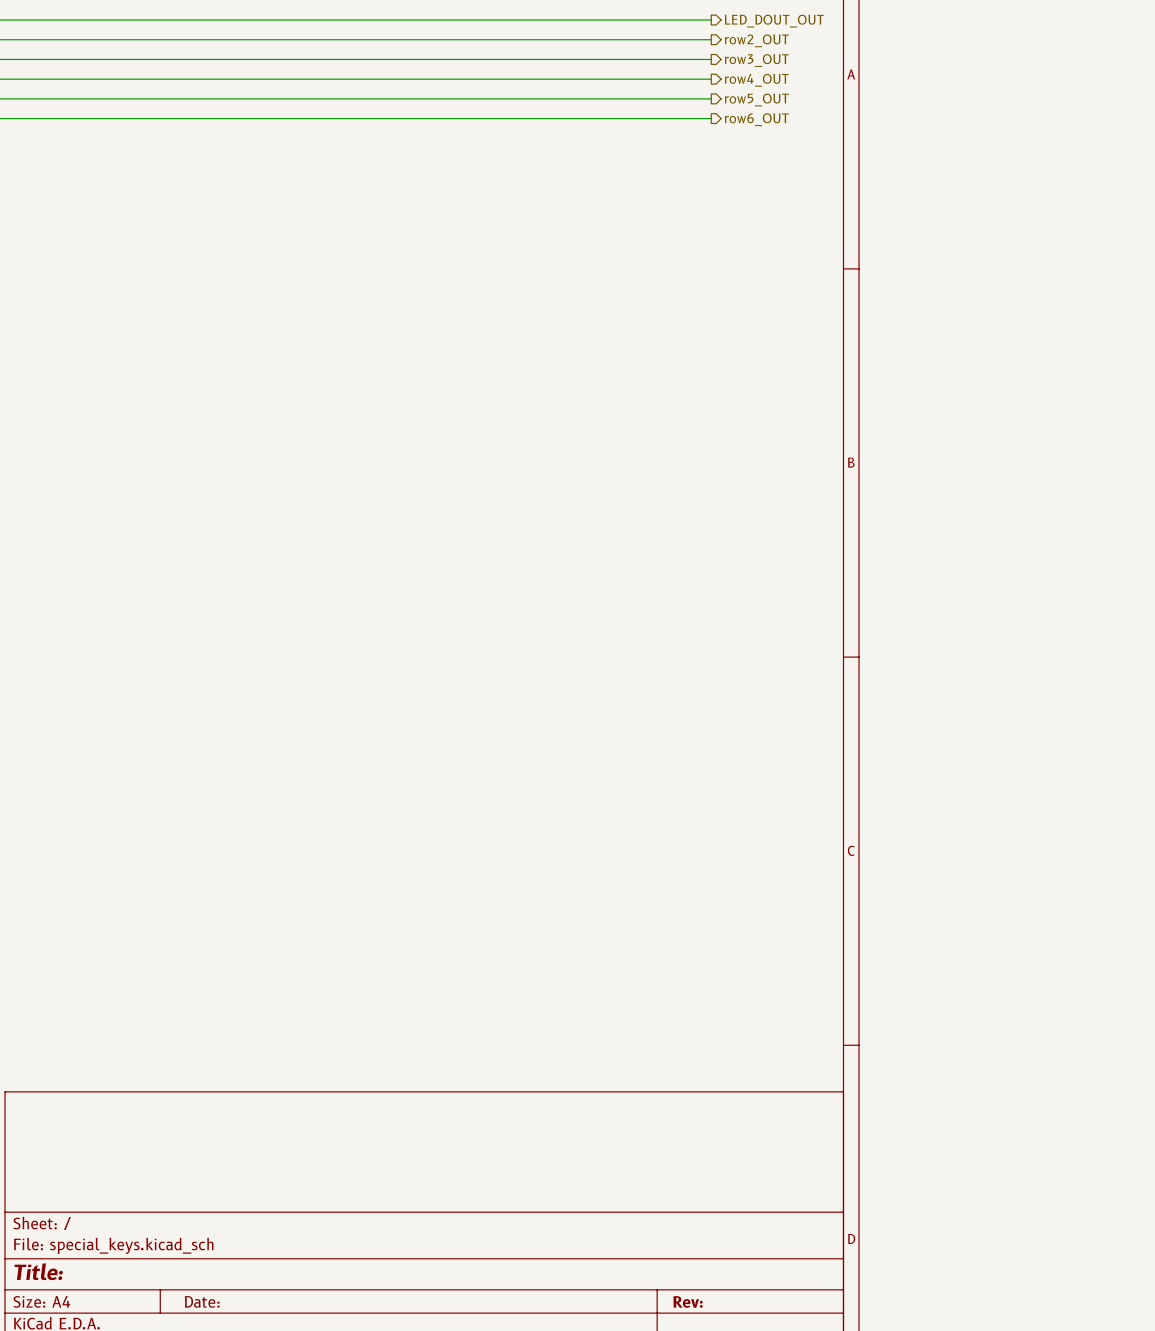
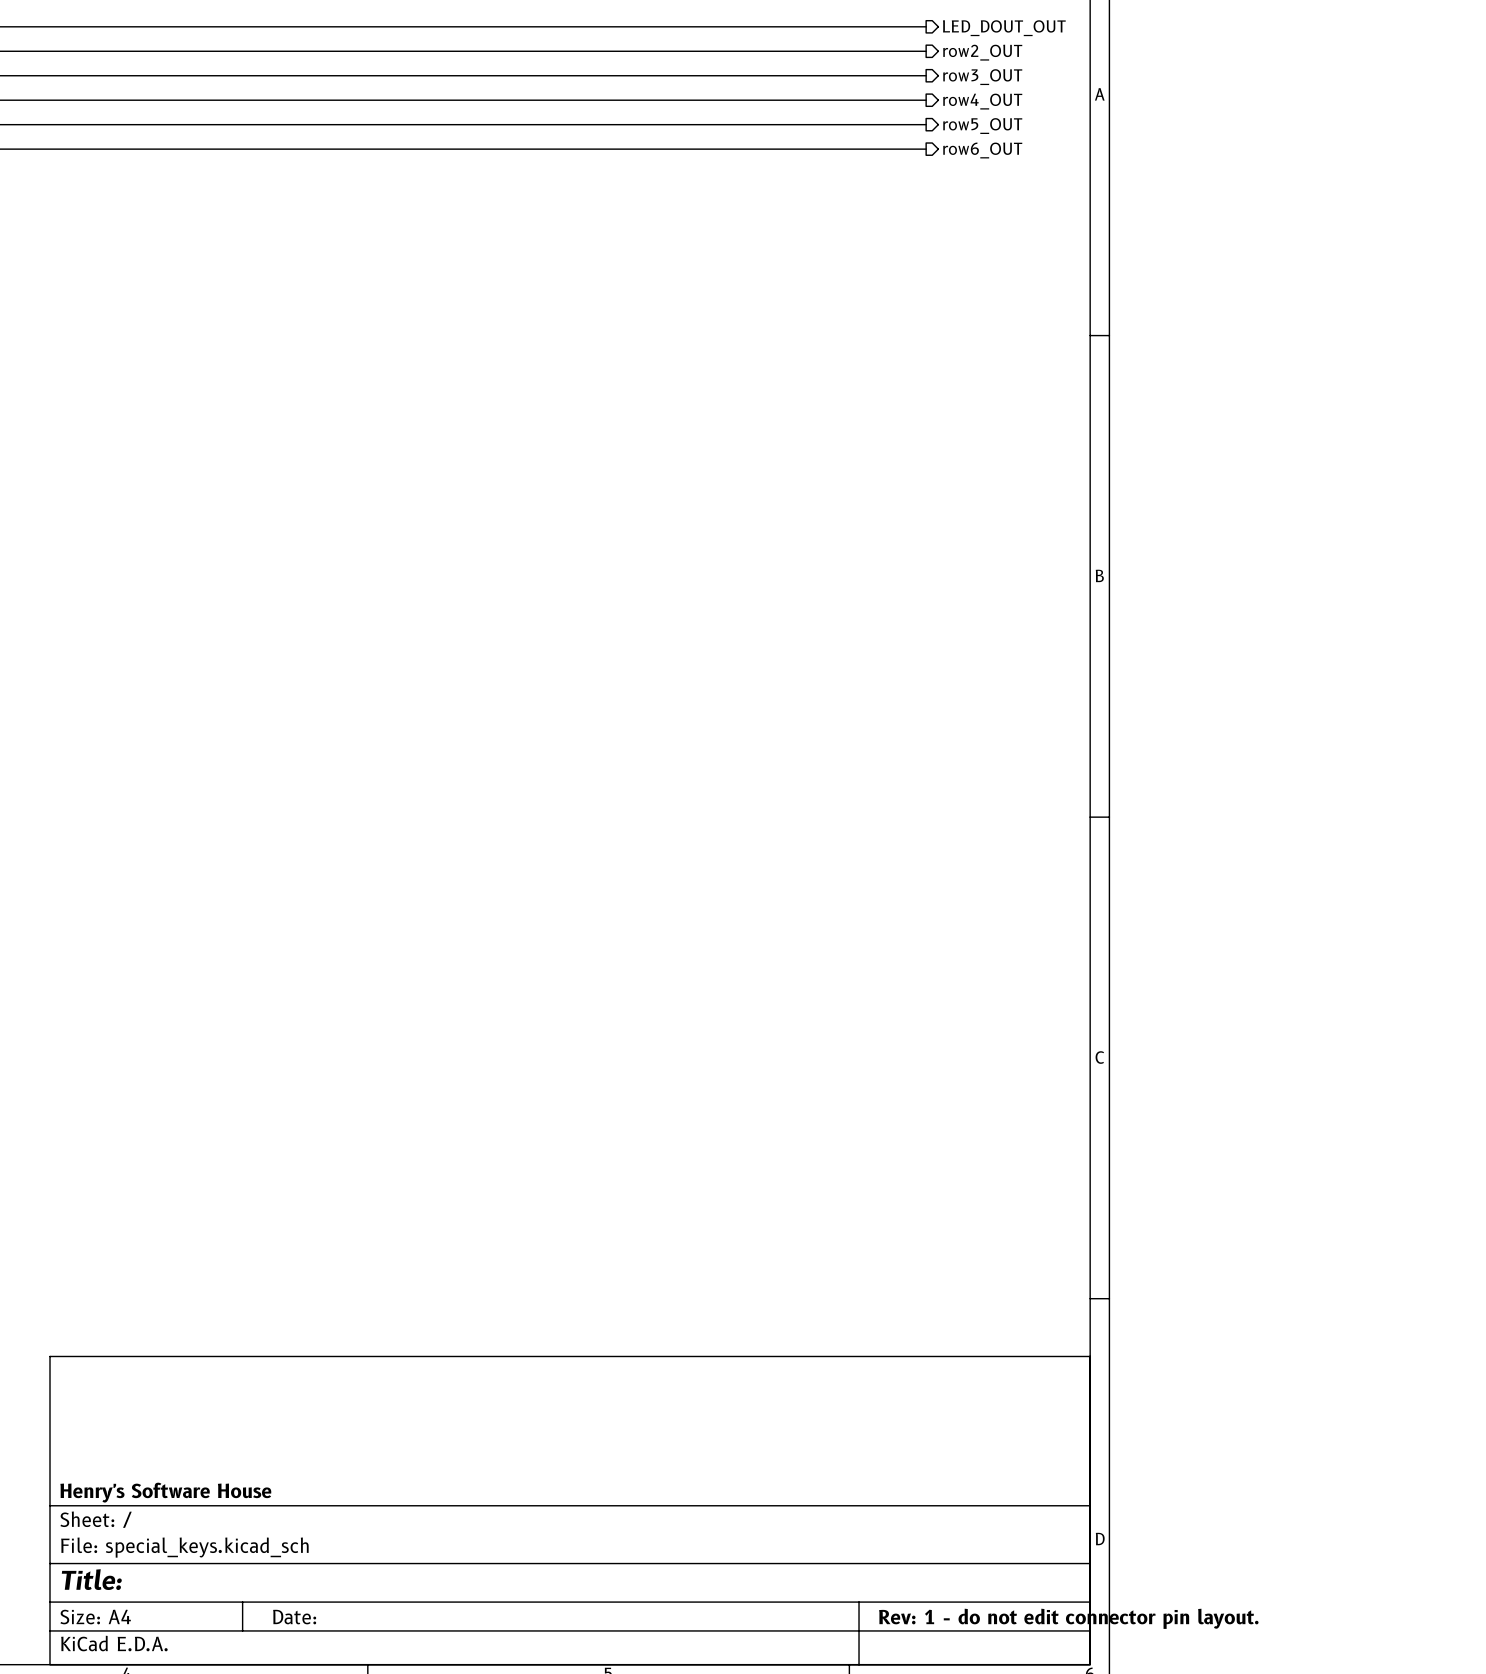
title block: none -> Henry's Software House (165, 1492)
title block: Rev: (688, 1301) -> Rev: 1 - do not edit connector pin layout. (1068, 1618)

